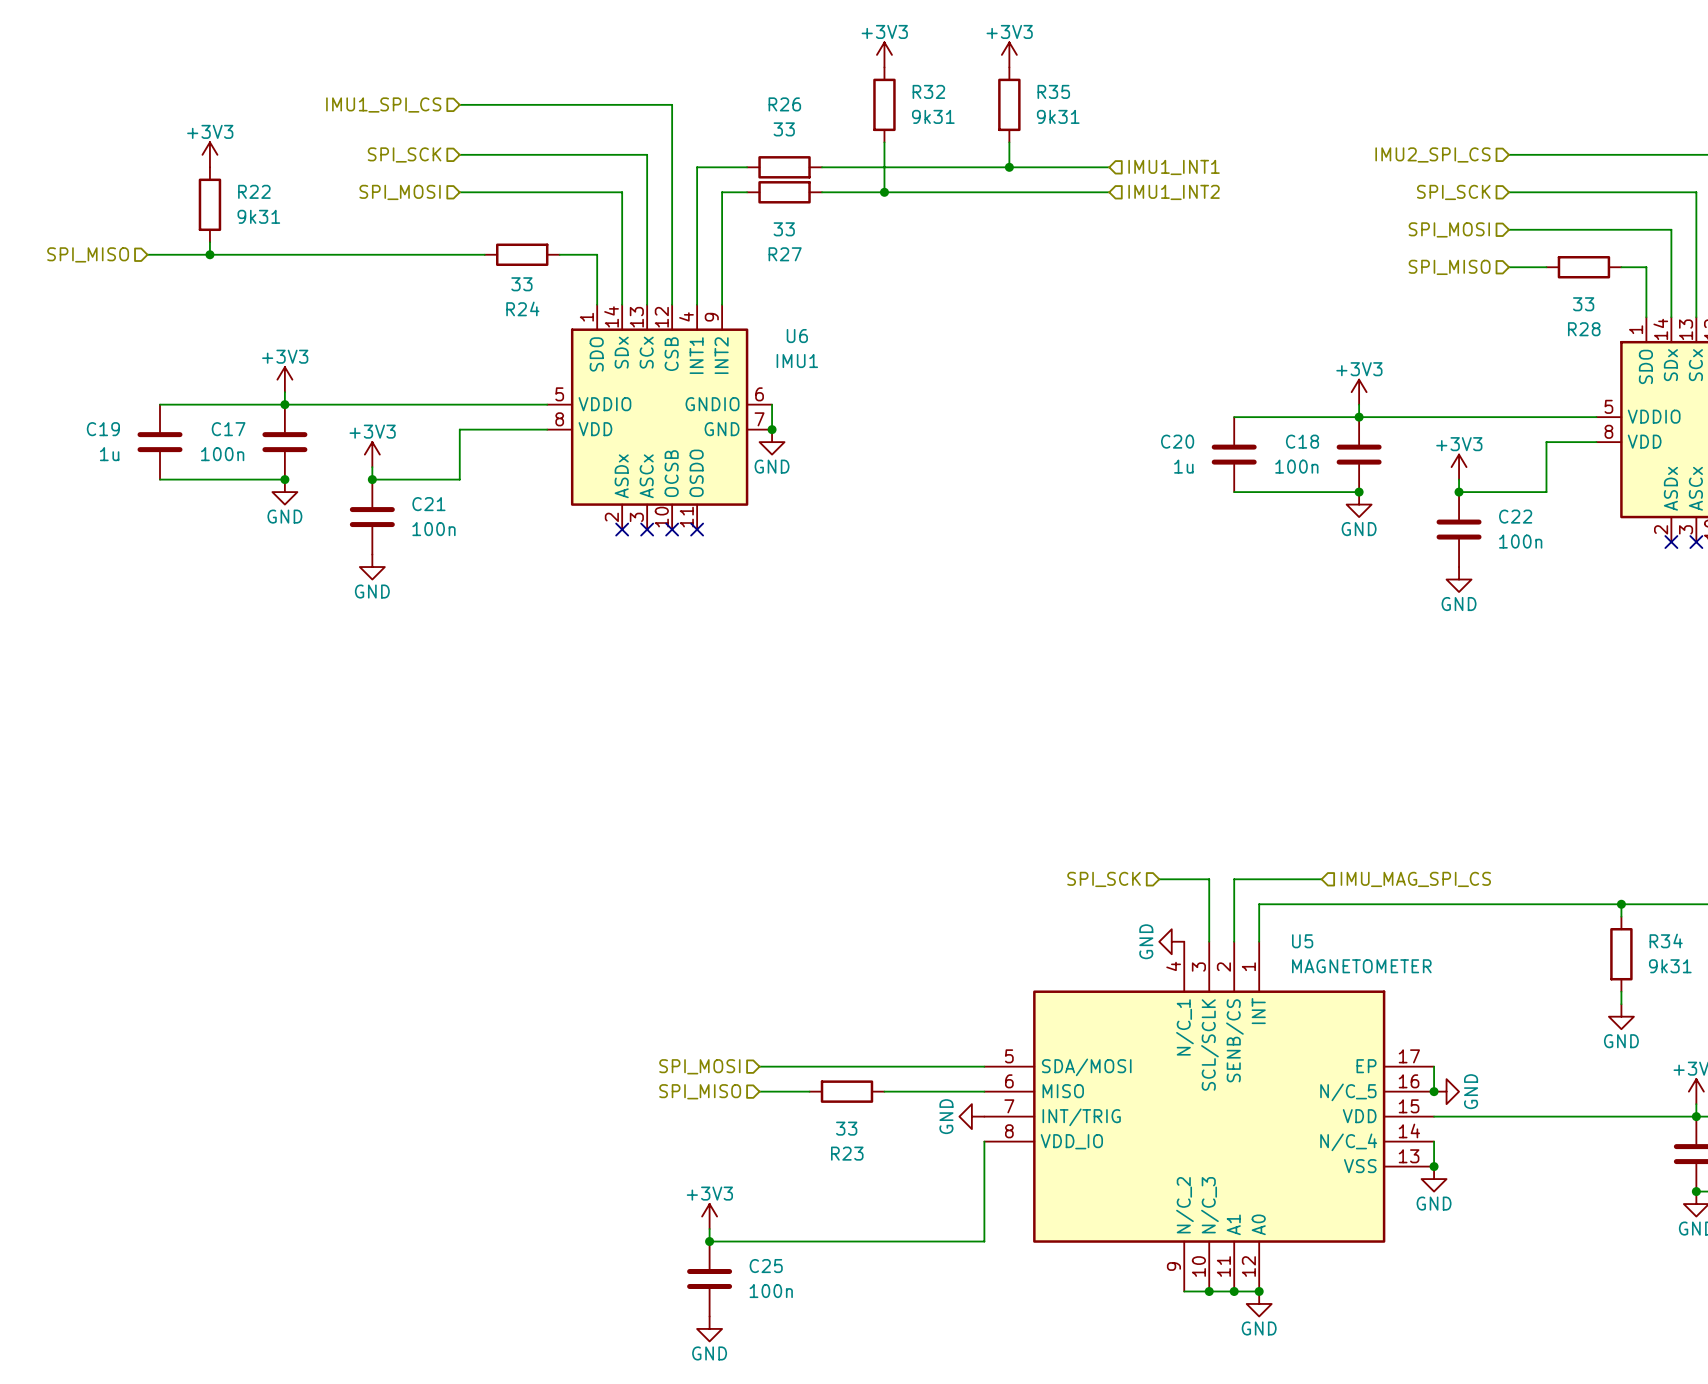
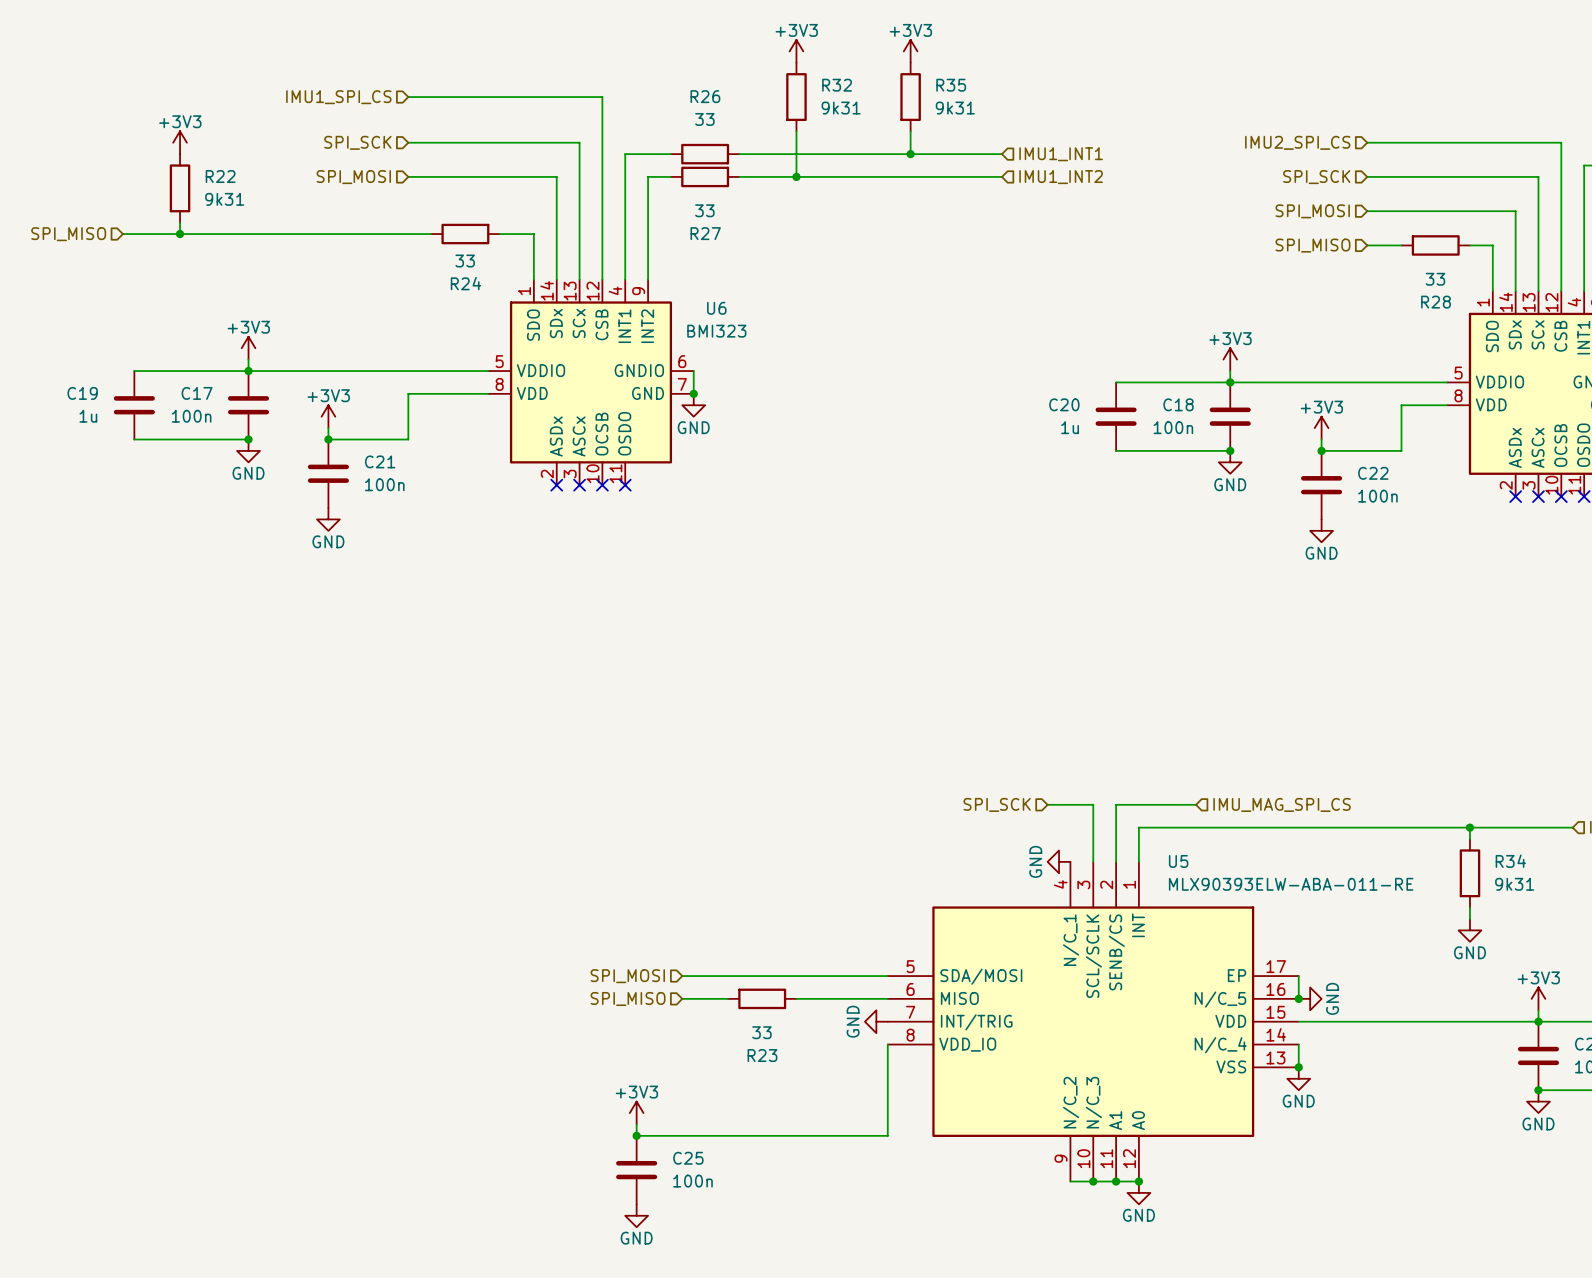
U6 value: IMU1 (797, 361) -> BMI323 (716, 331)
U5 value: MAGNETOMETER (1361, 966) -> MLX90393ELW-ABA-011-RE (1291, 884)

